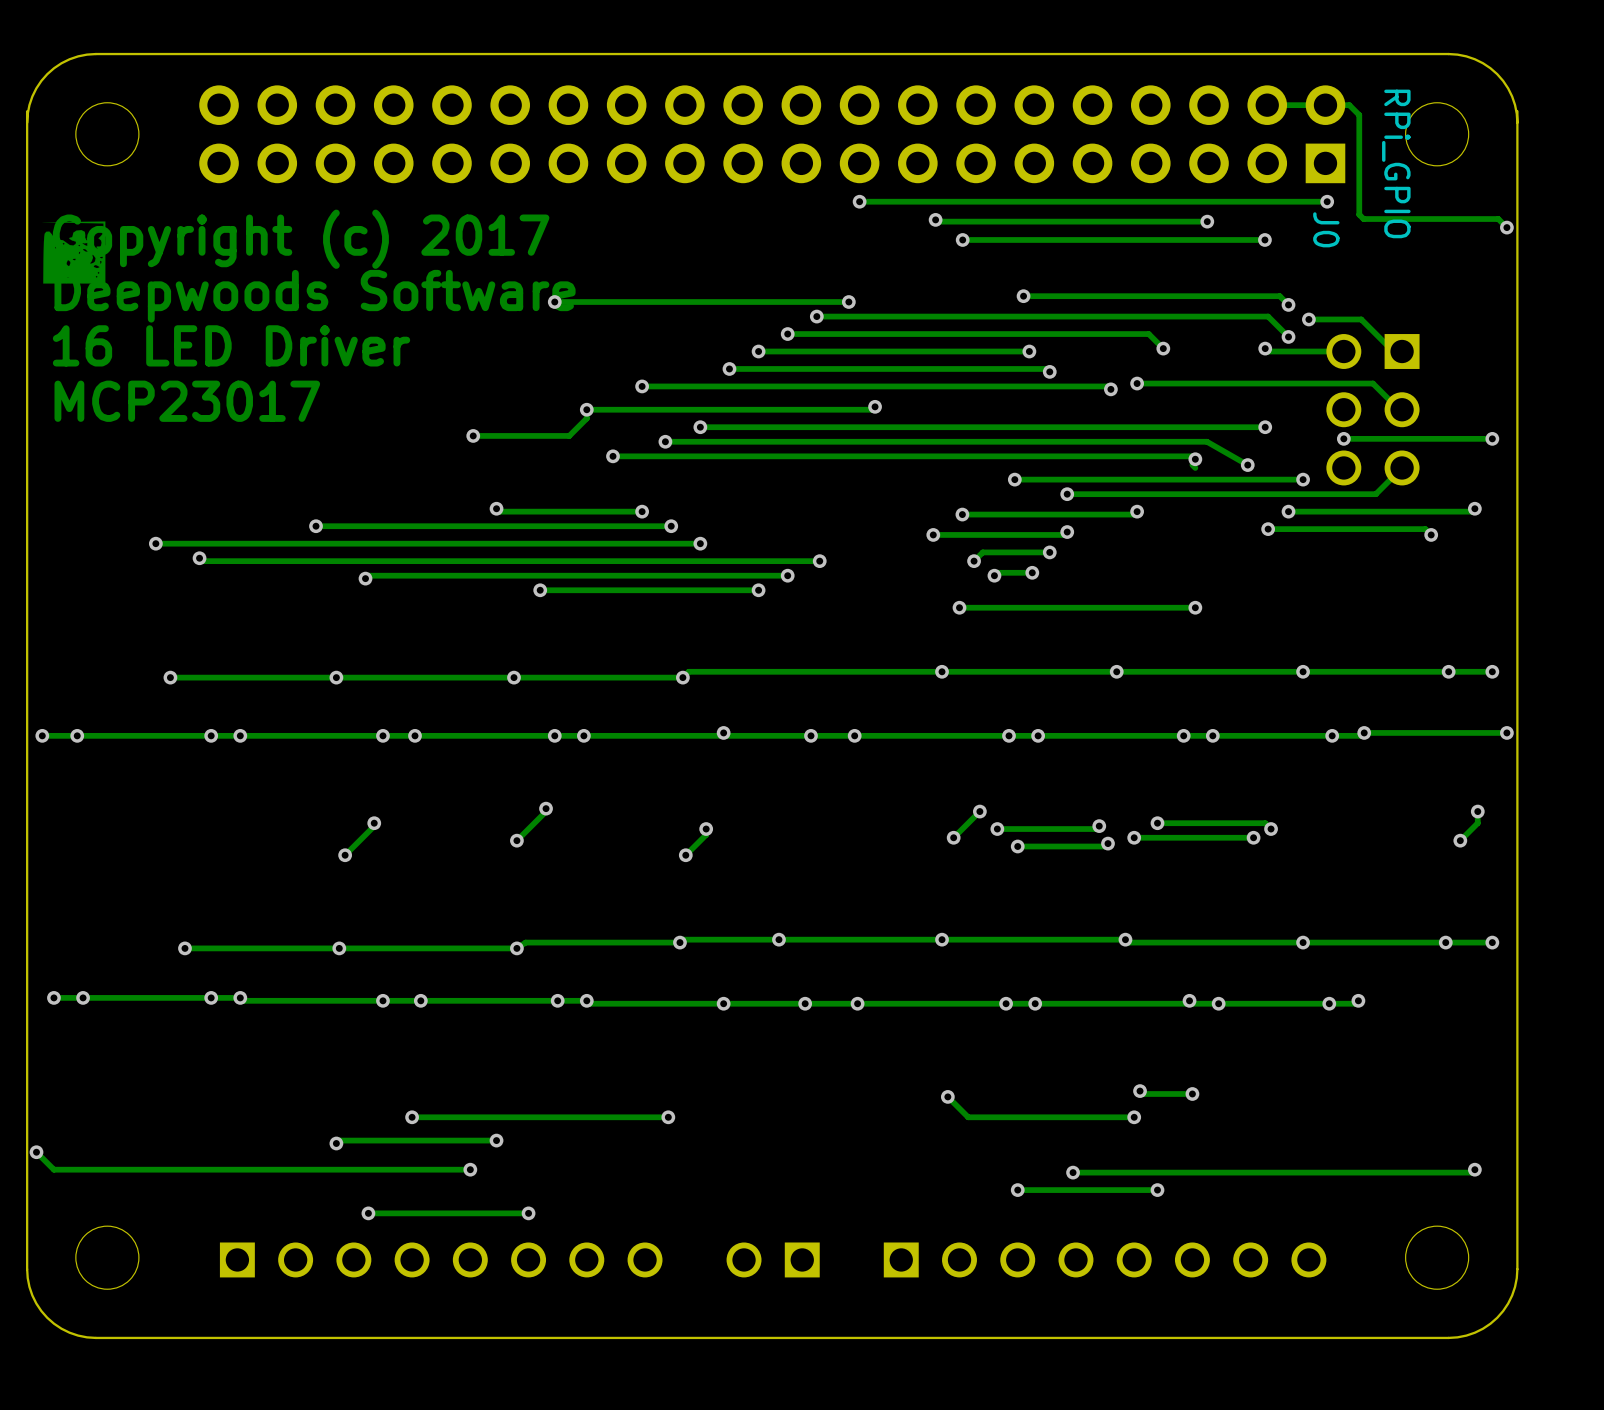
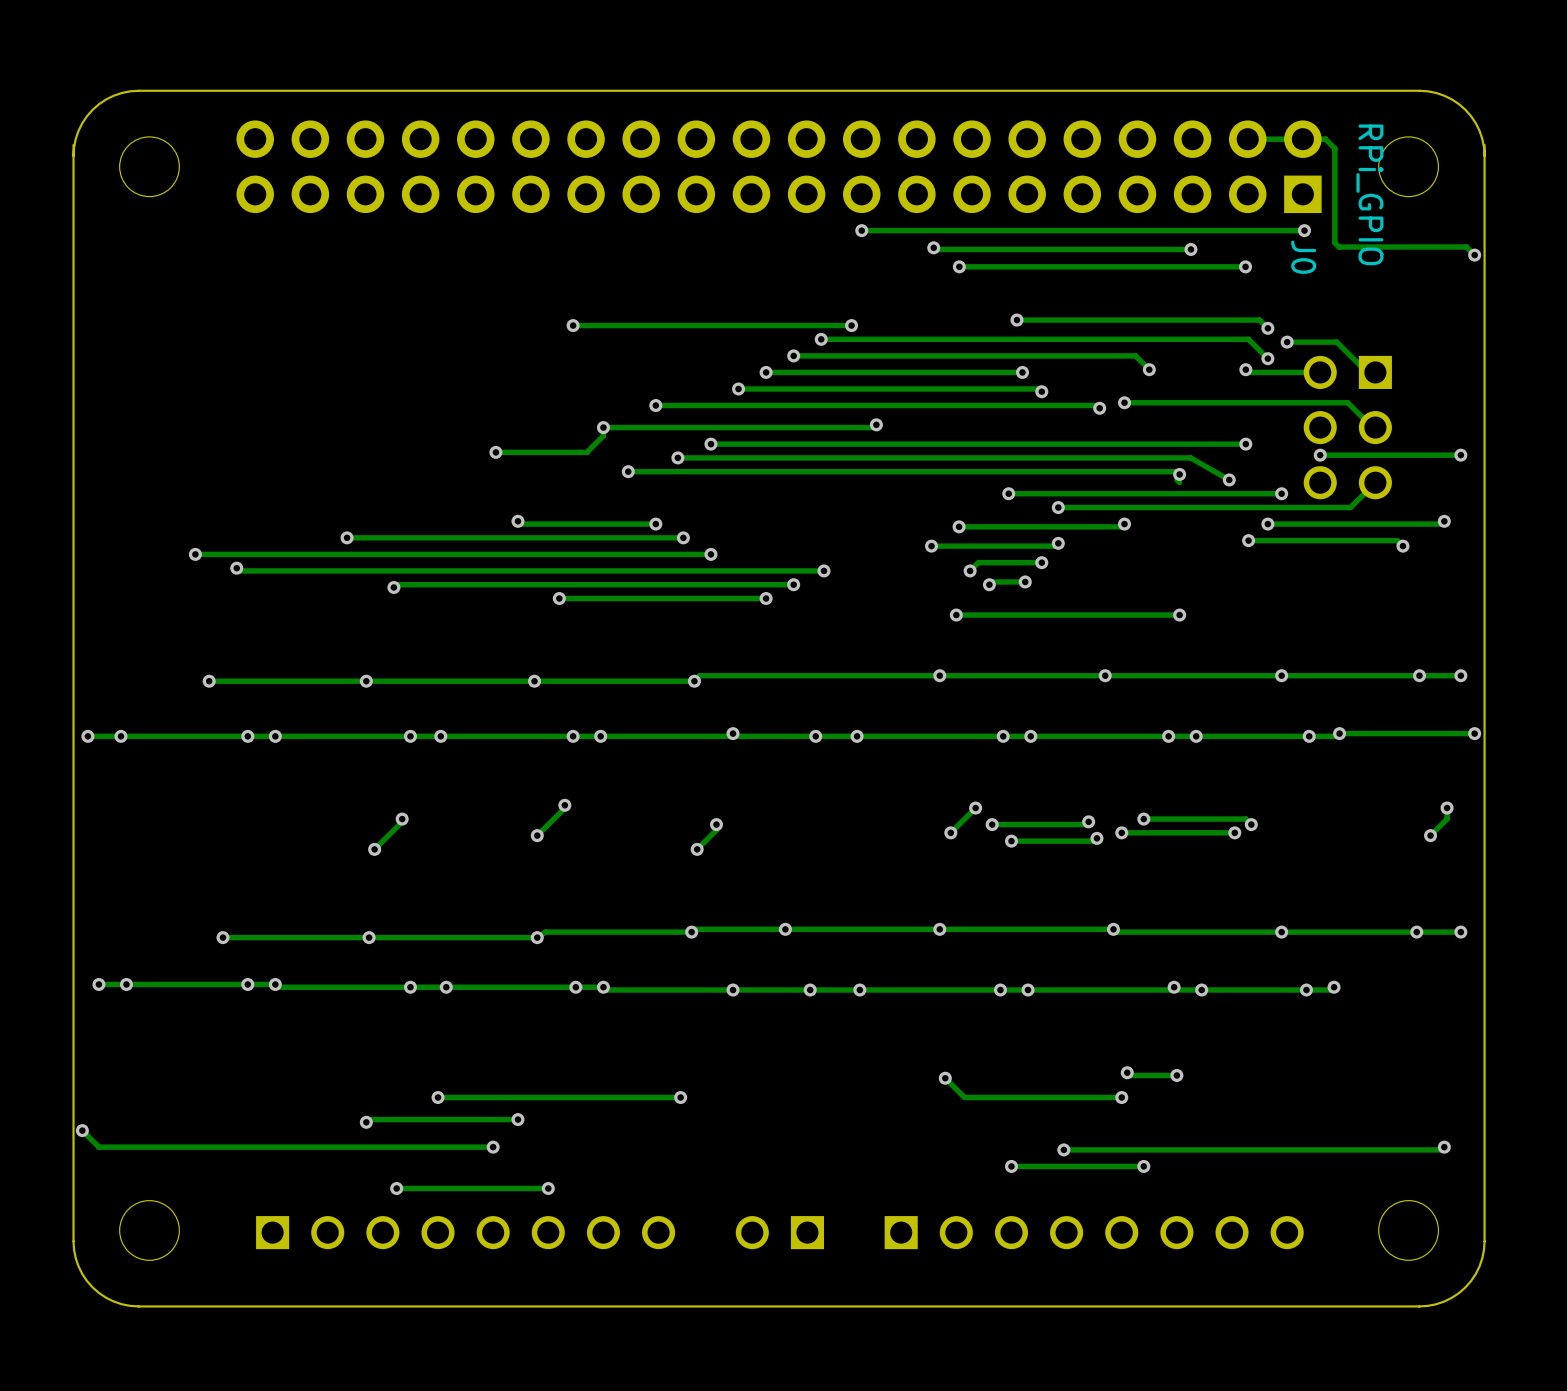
drawing: [42, 221, 106, 284] -> none
text: Copyright (c) 2017 (301, 239) -> none
text: Deepwoods Software (315, 296) -> none
text: 16 LED Driver (231, 345) -> none
text: MCP23017 (187, 401) -> none

